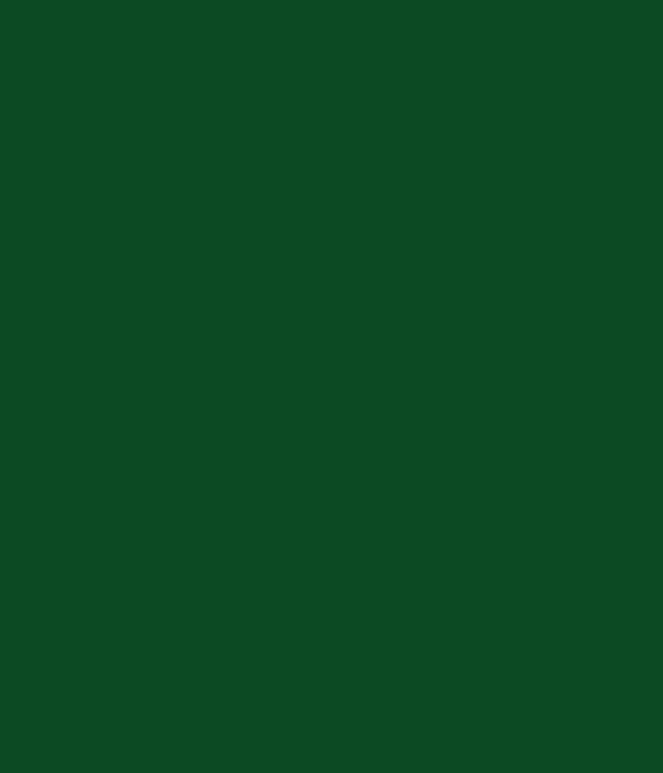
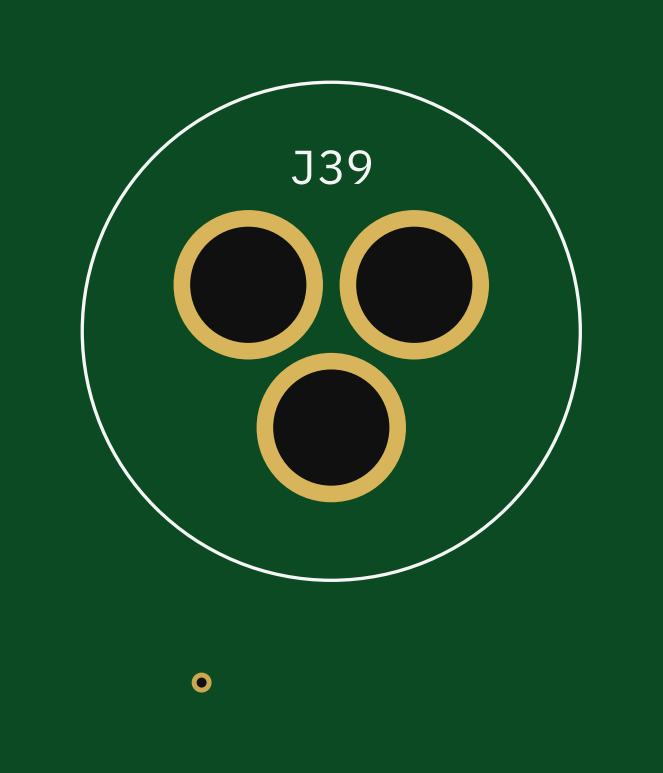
J39: none -> (331, 331)
via: none -> (201, 682)

